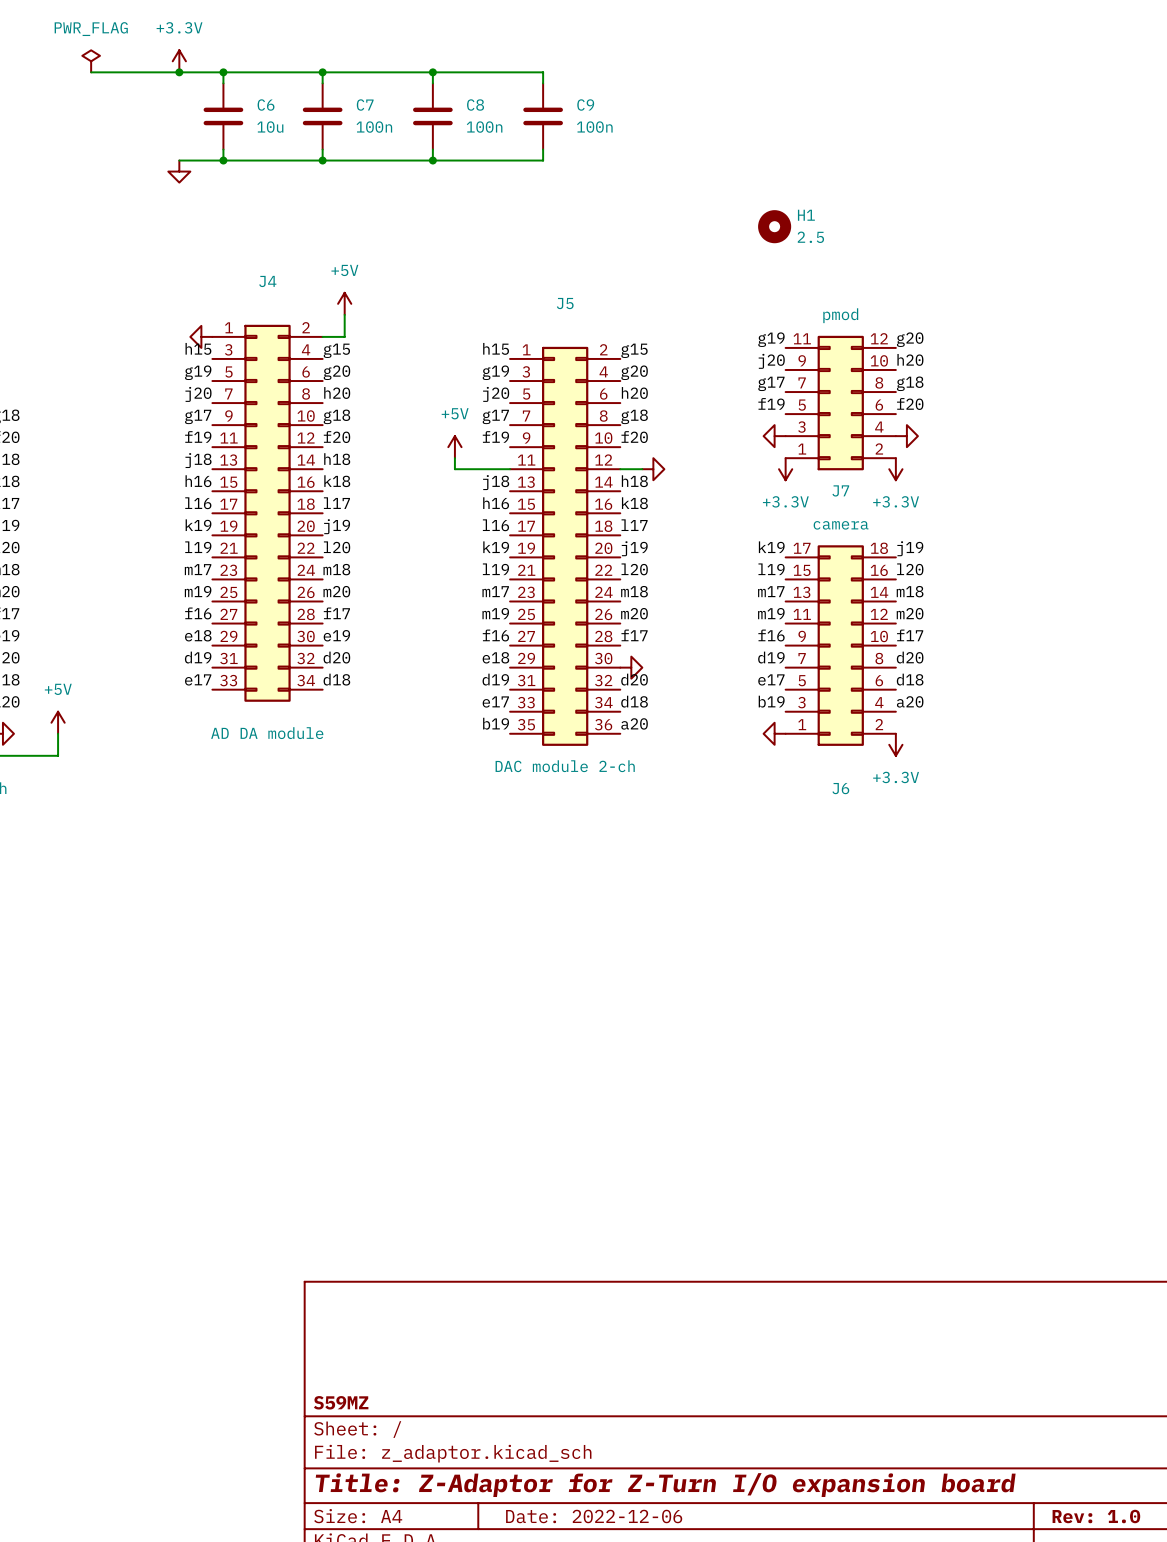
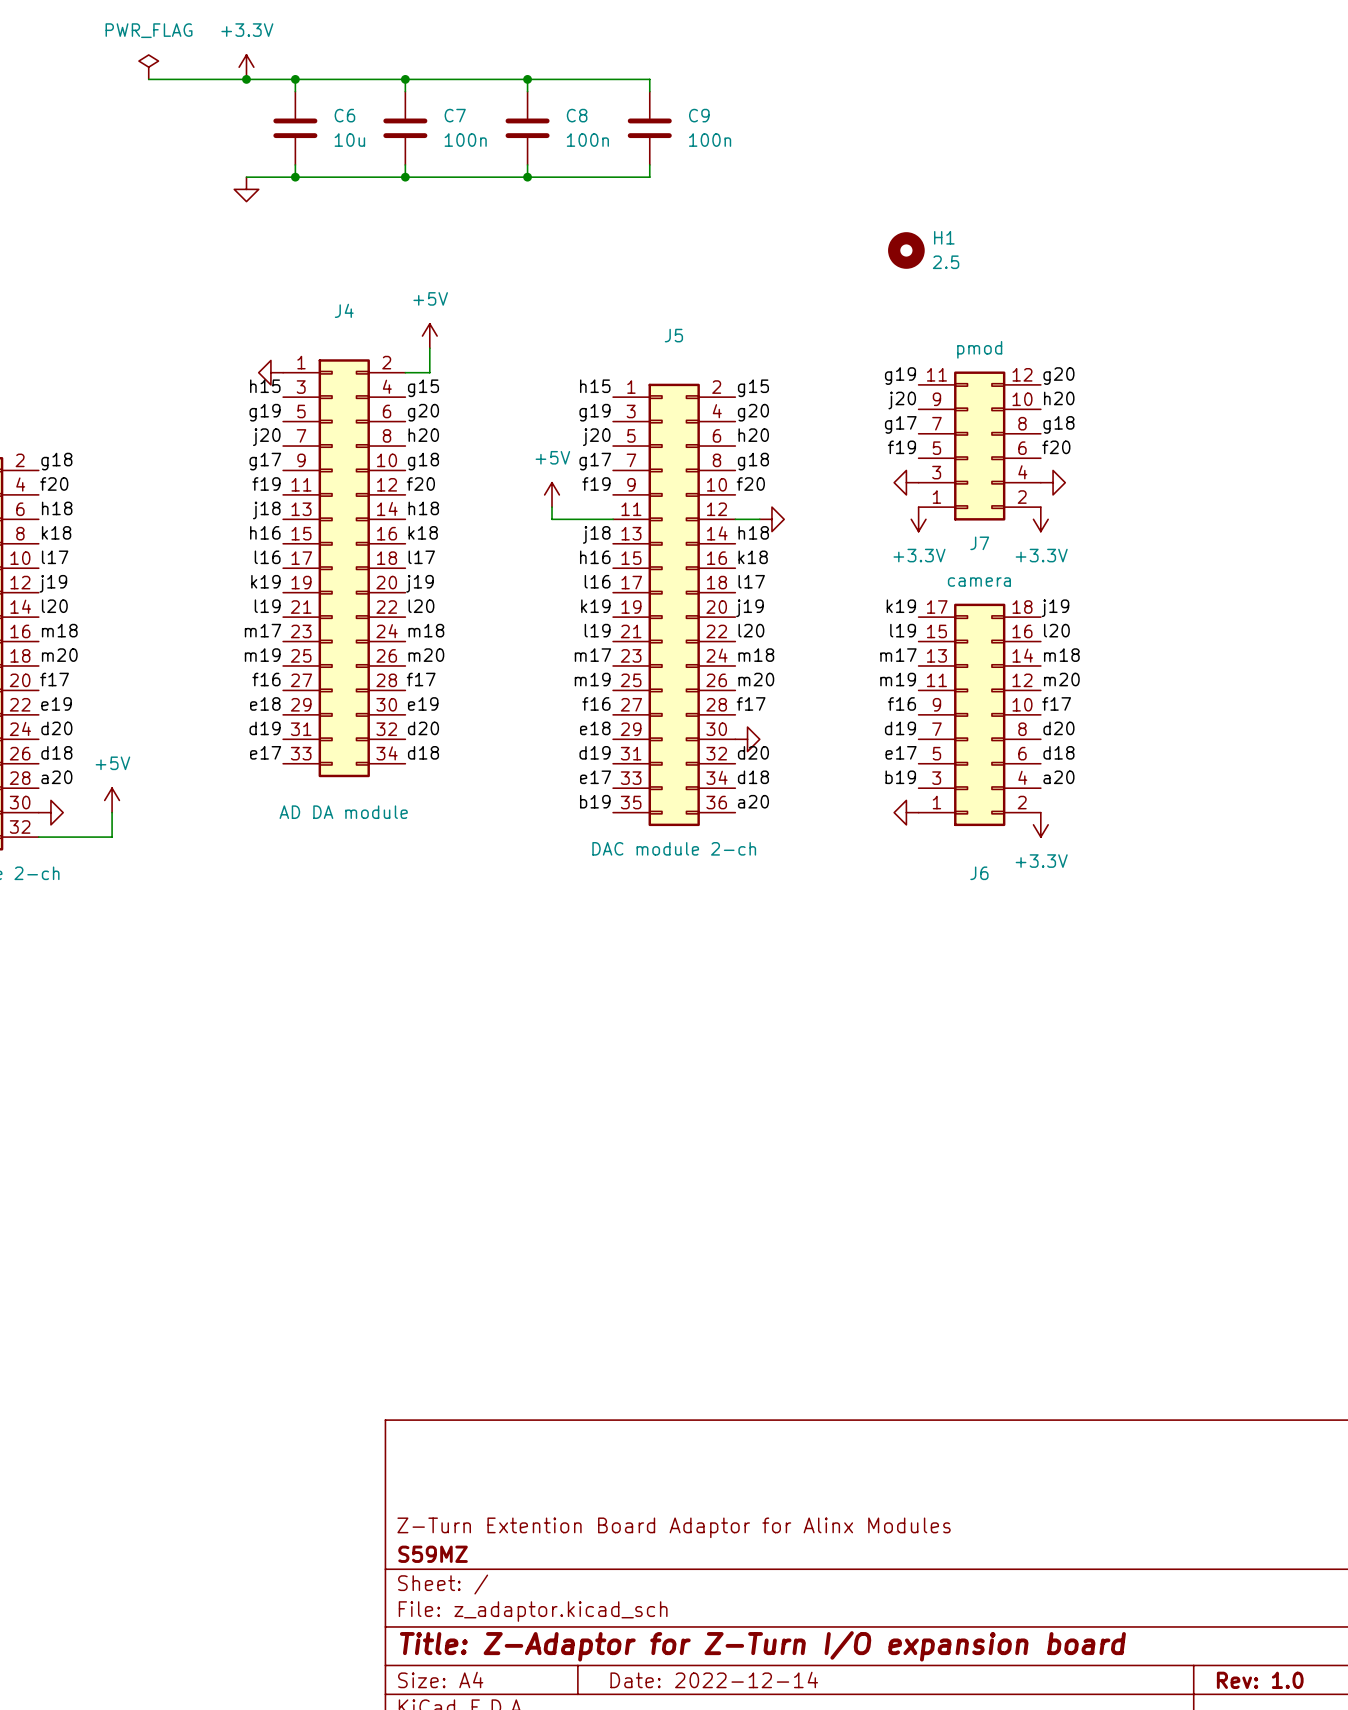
title block: none -> Z-Turn Extention Board Adaptor for Alinx Modules (674, 1527)
title block: Date: 2022-12-06 (594, 1516) -> Date: 2022-12-14 (714, 1679)

